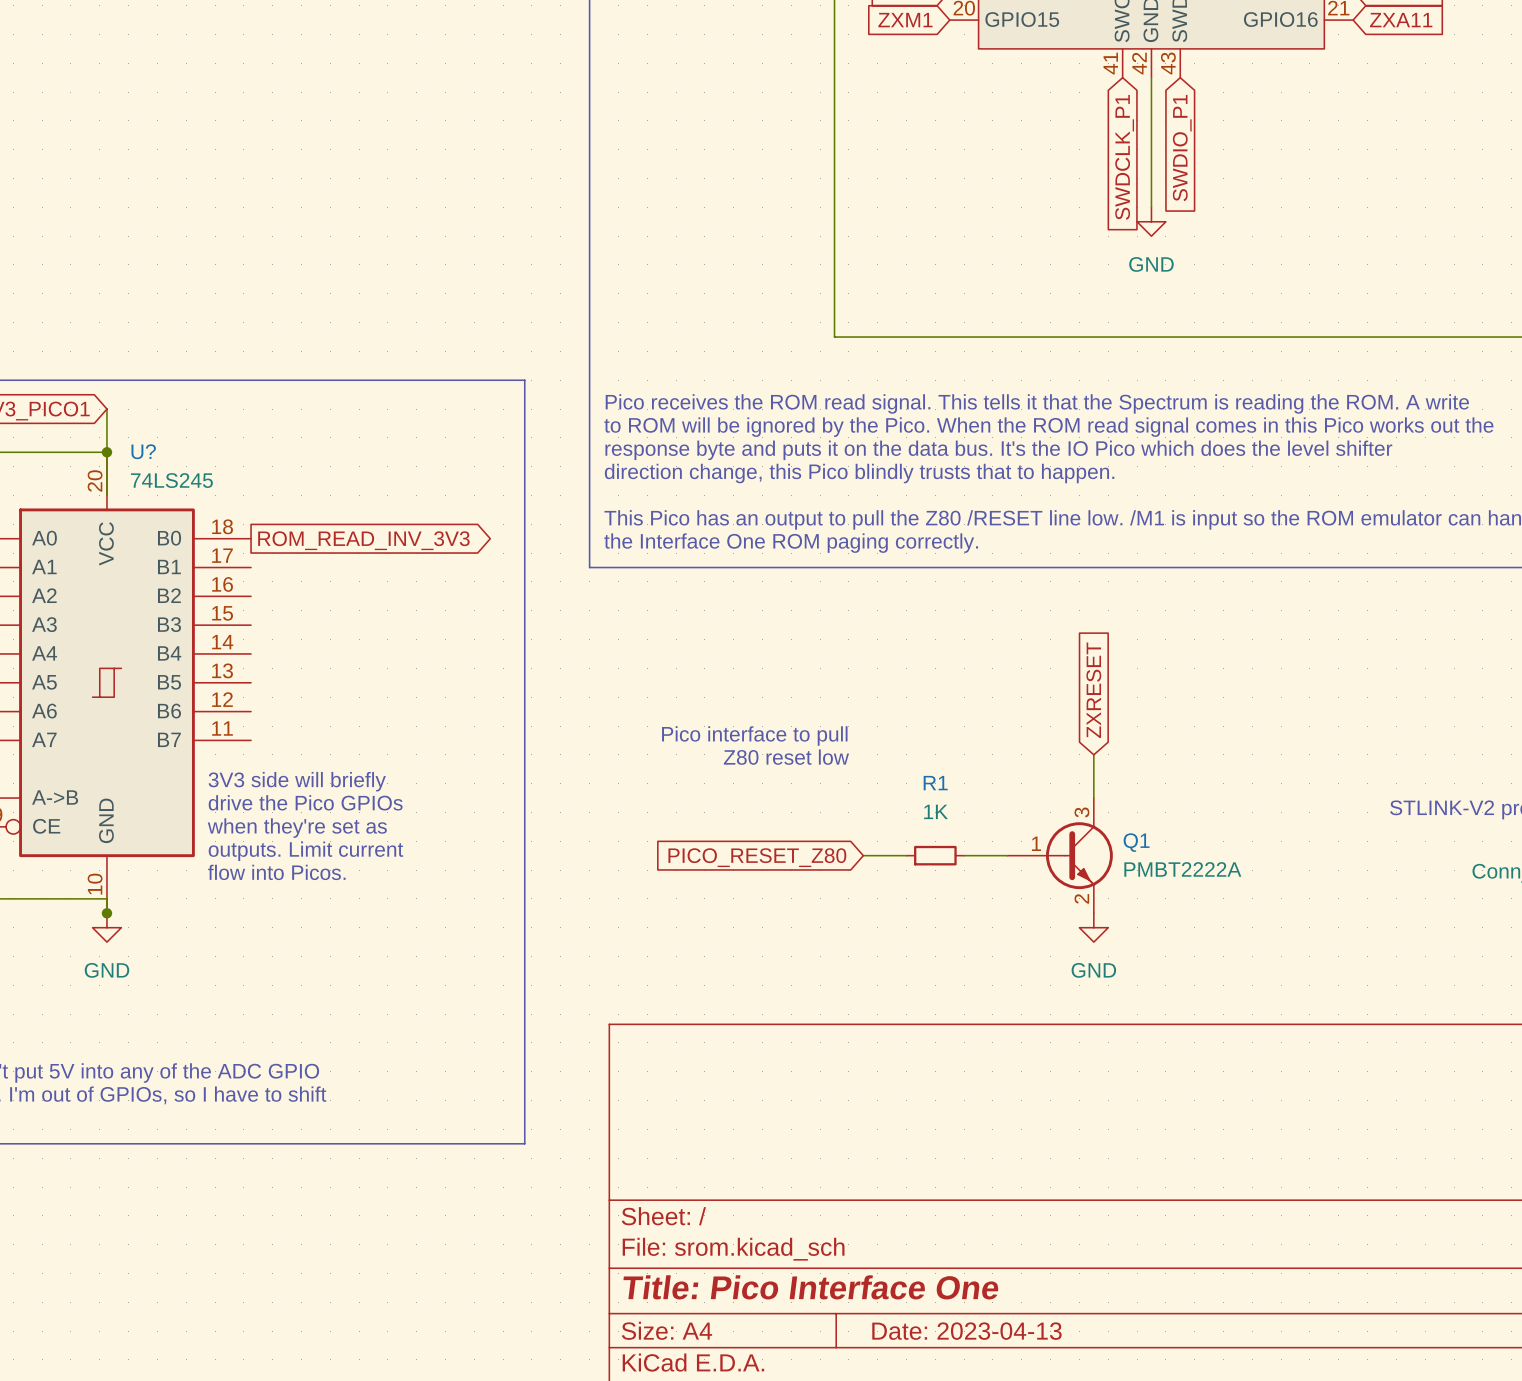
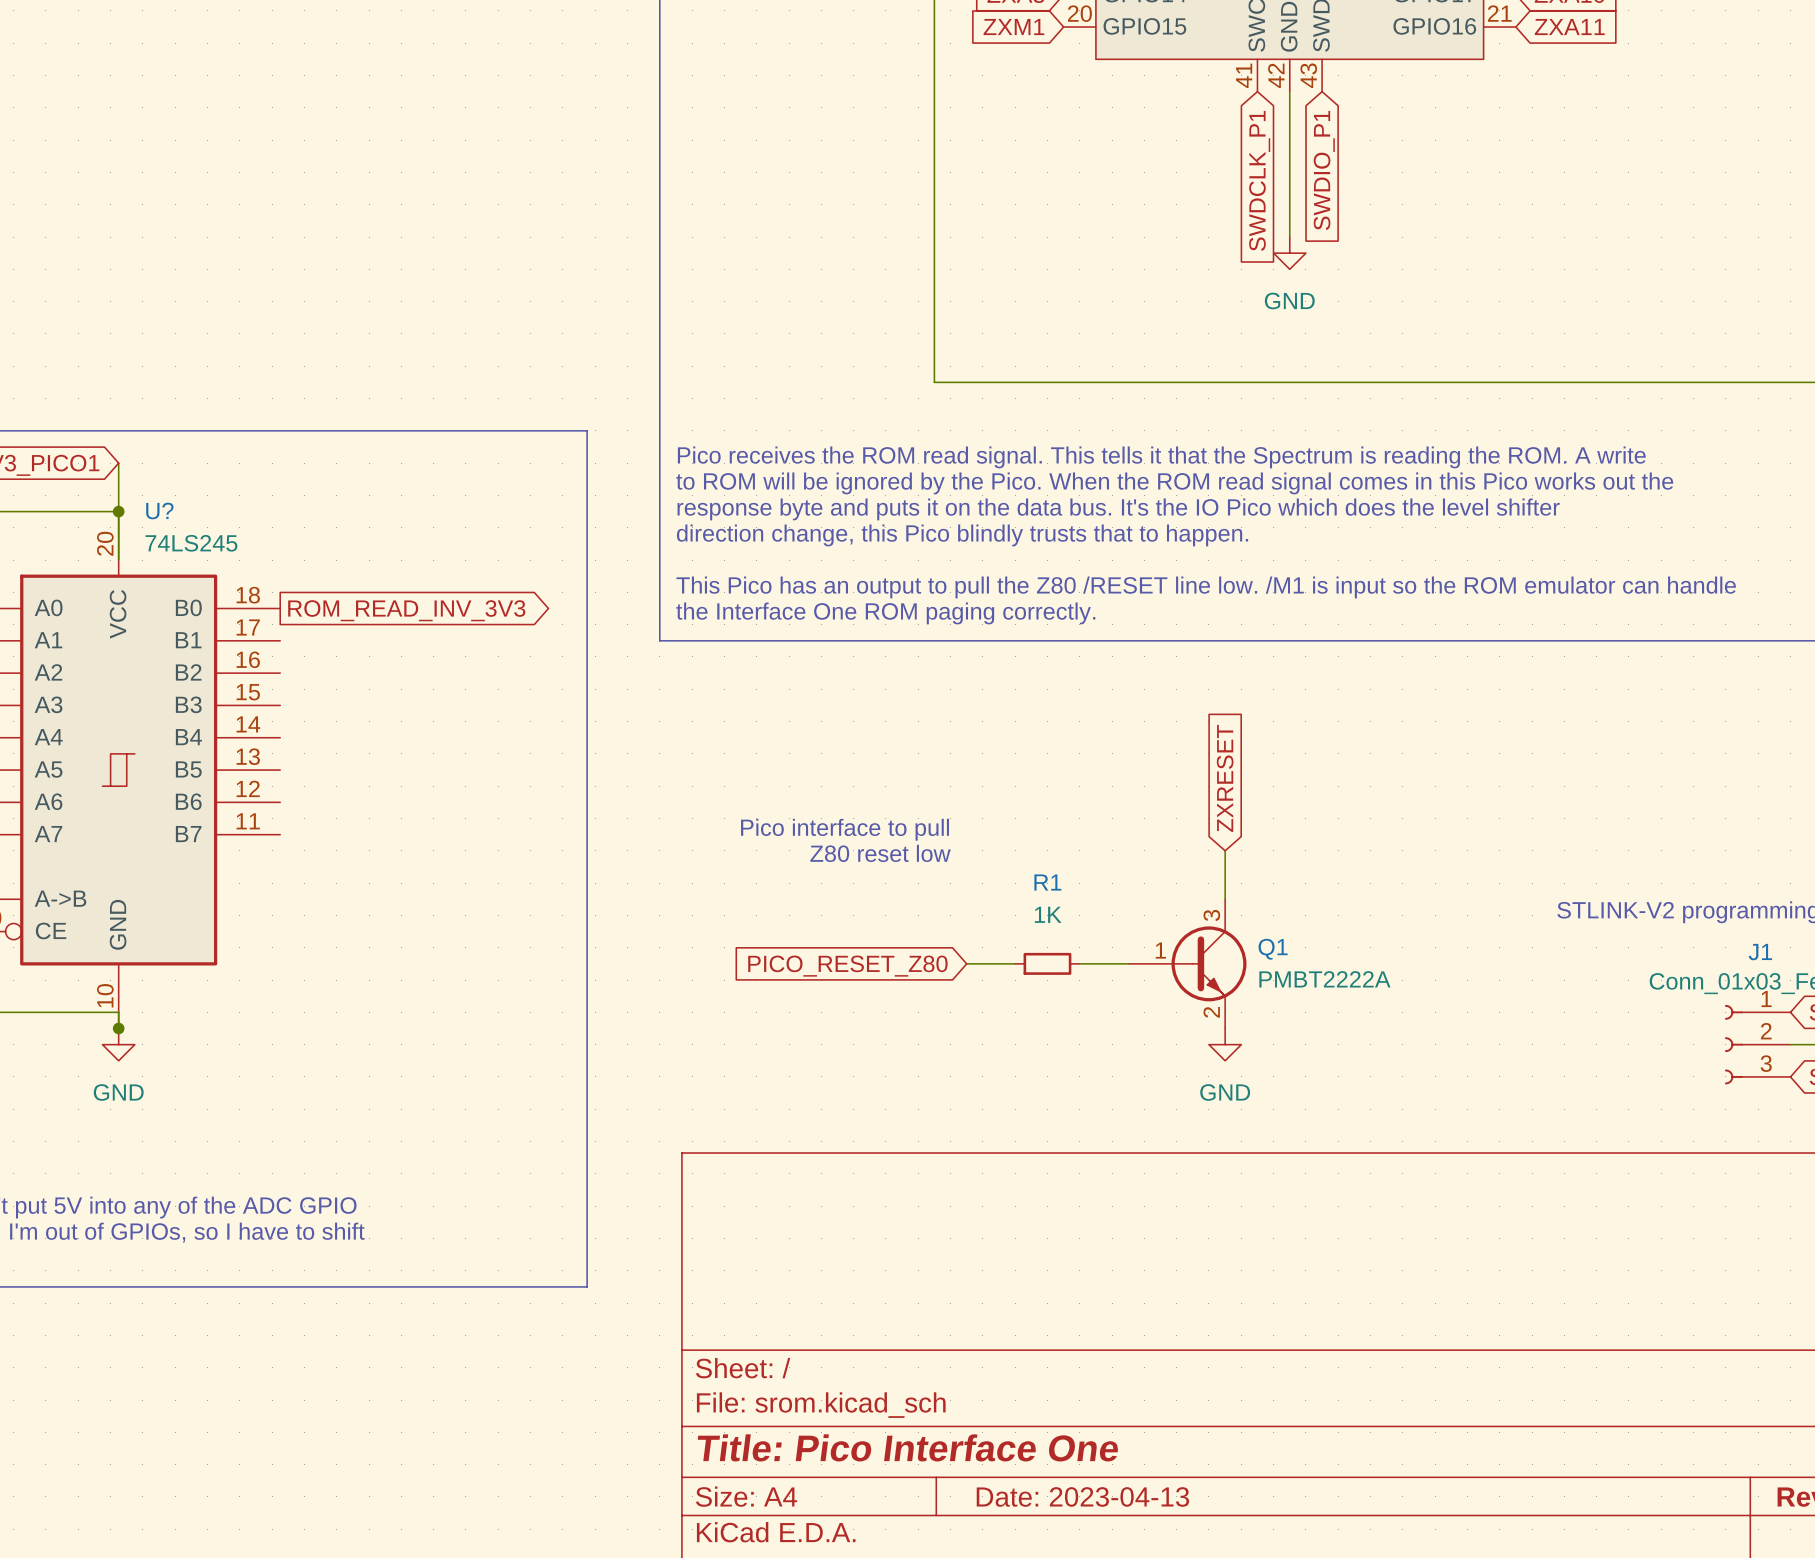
text: 3V3 side will briefly (297, 781) -> none
text: drive the Pico GPIOs (305, 802) -> none
text: when they're set as (297, 828) -> none
text: outputs. Limit current (305, 851) -> none
text: flow into Picos. (276, 872) -> none

